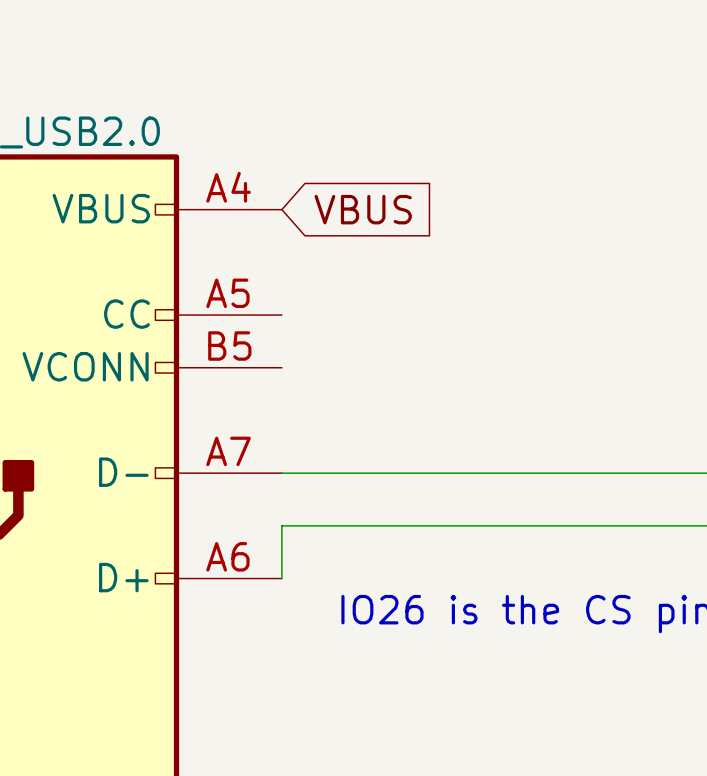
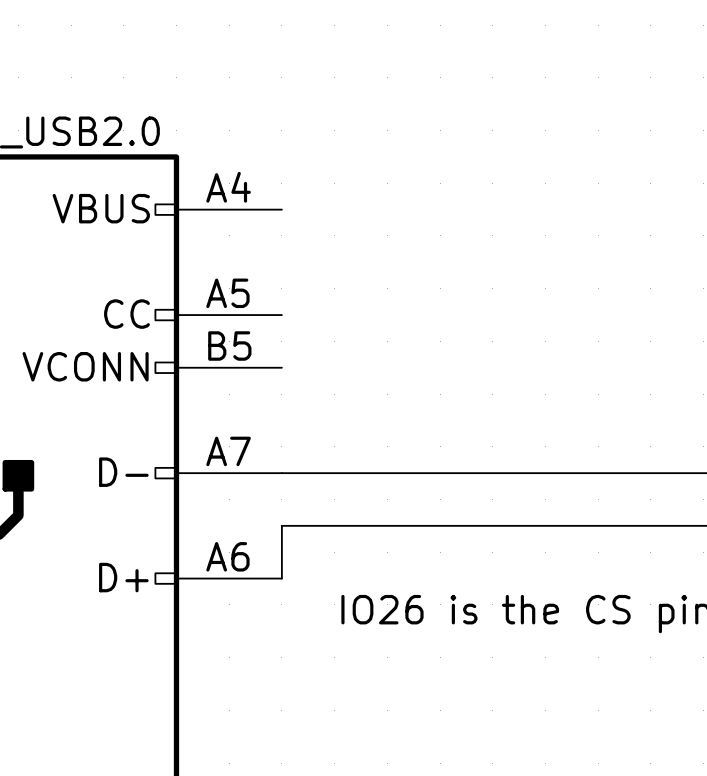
global label: VBUS (363, 209) -> none

